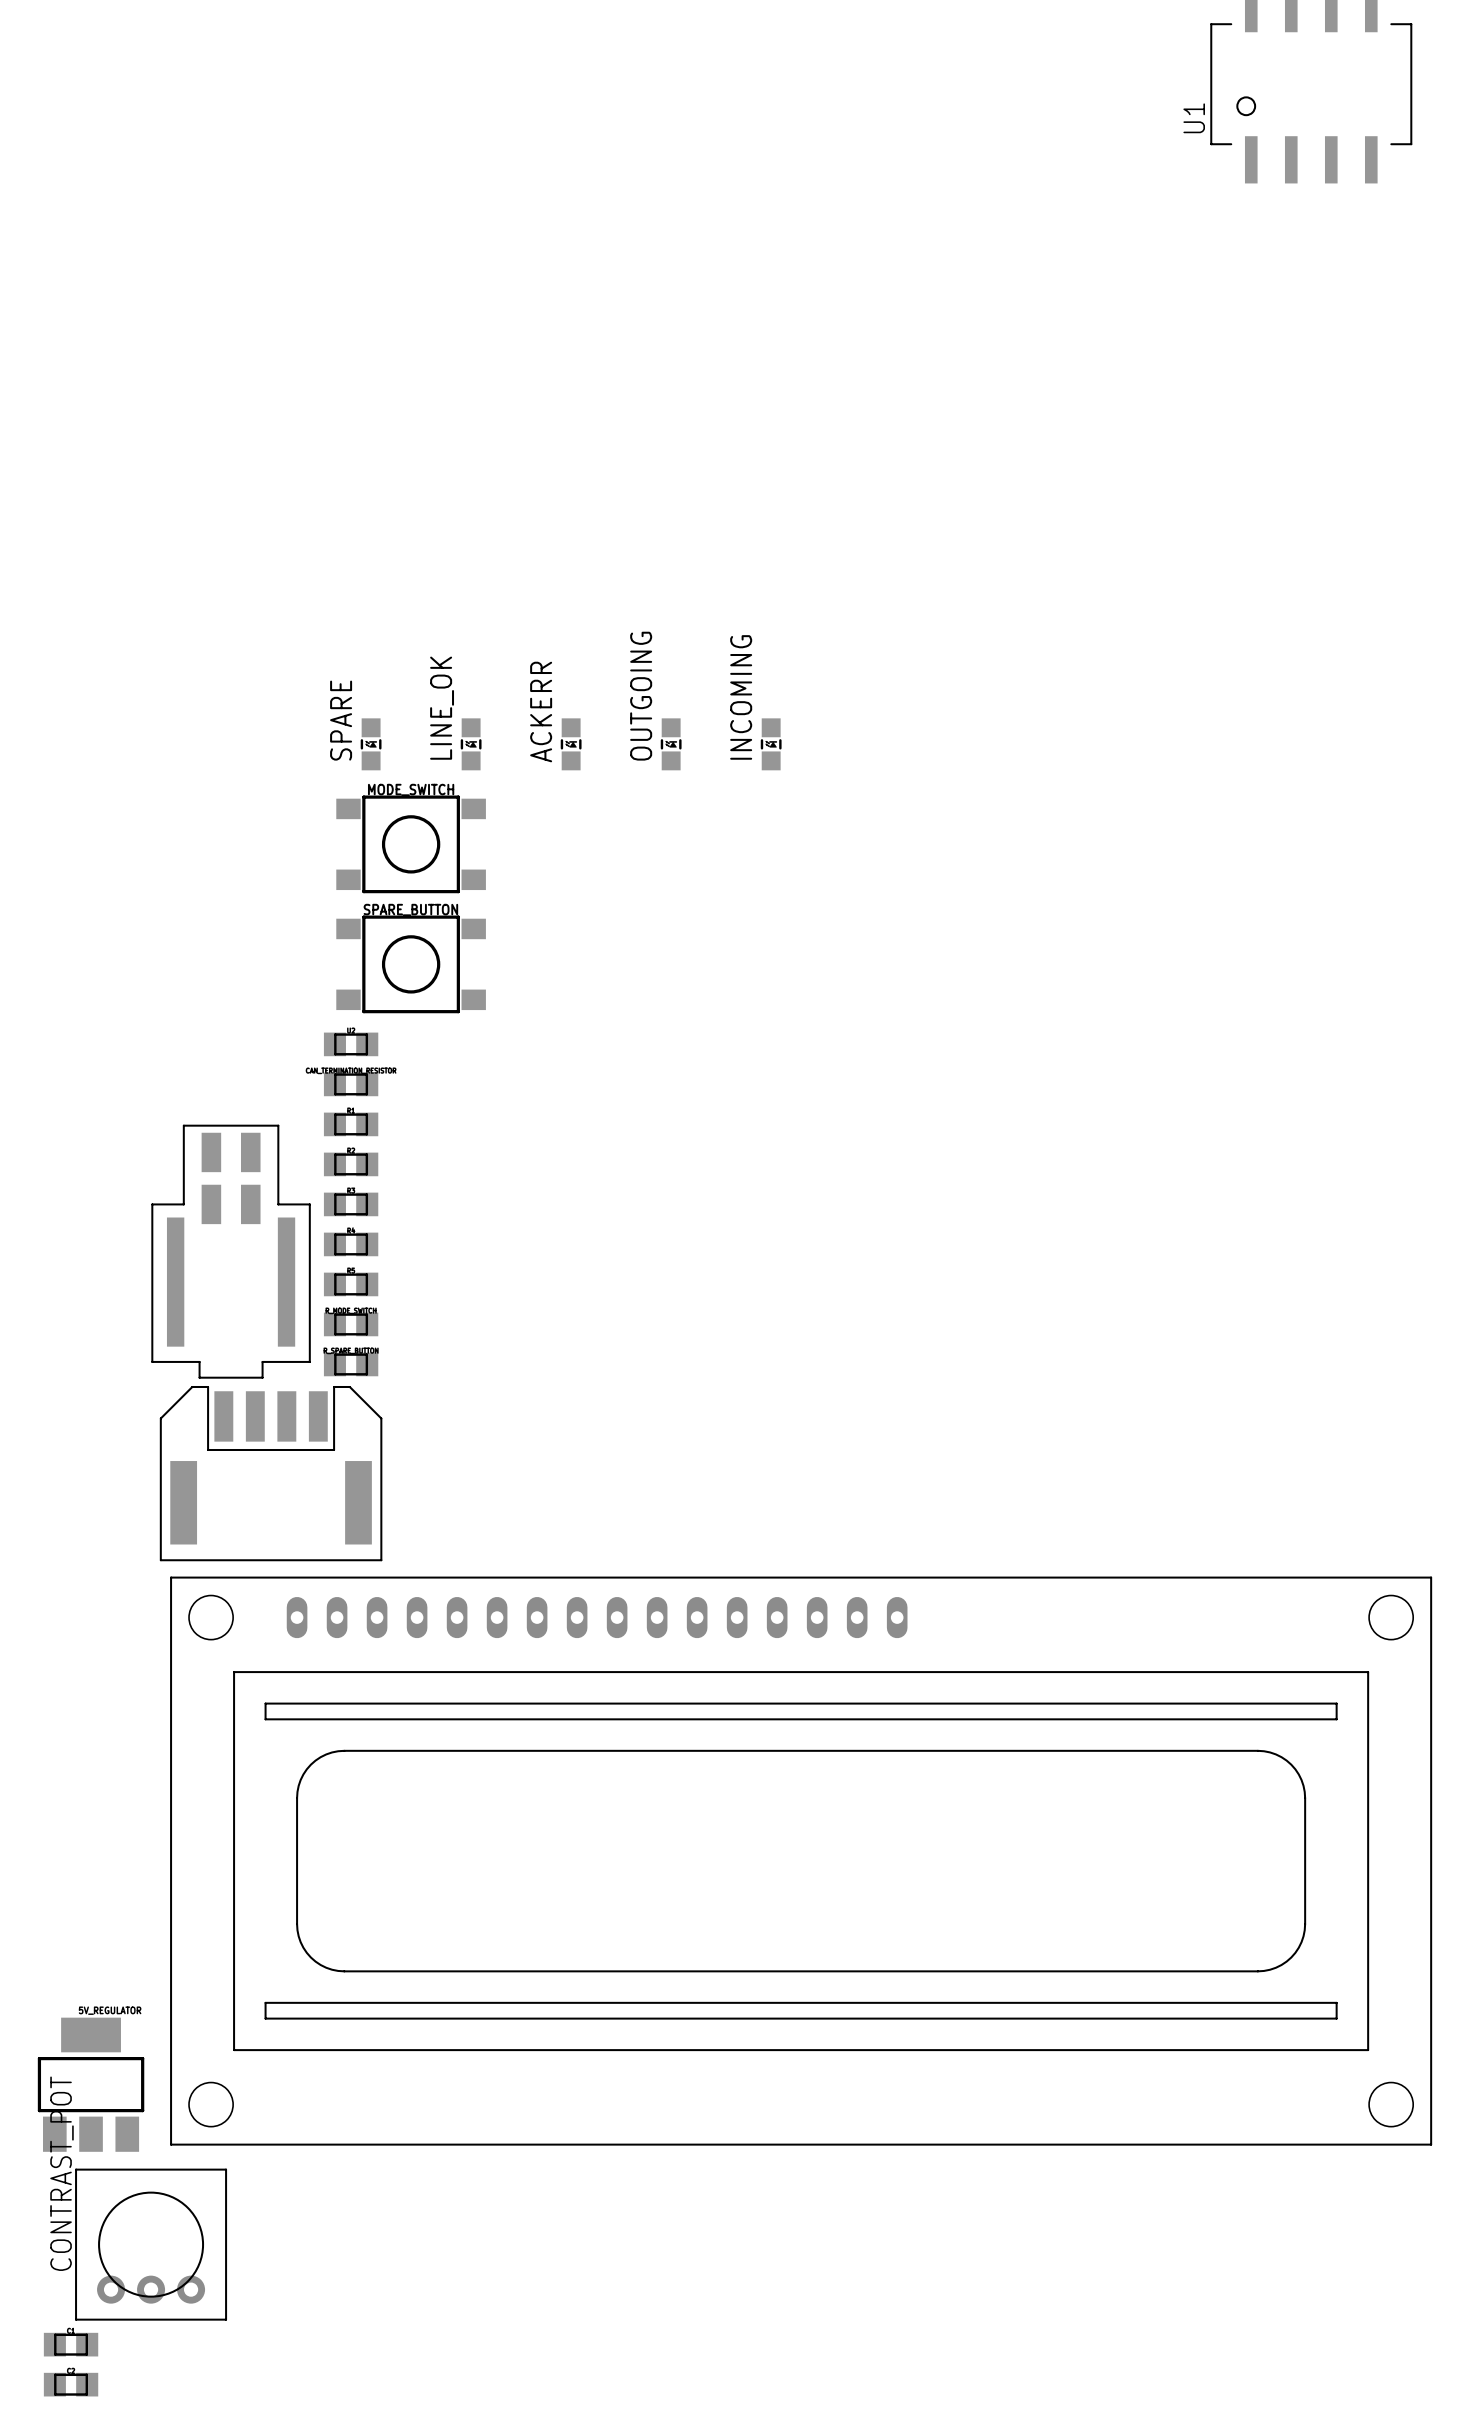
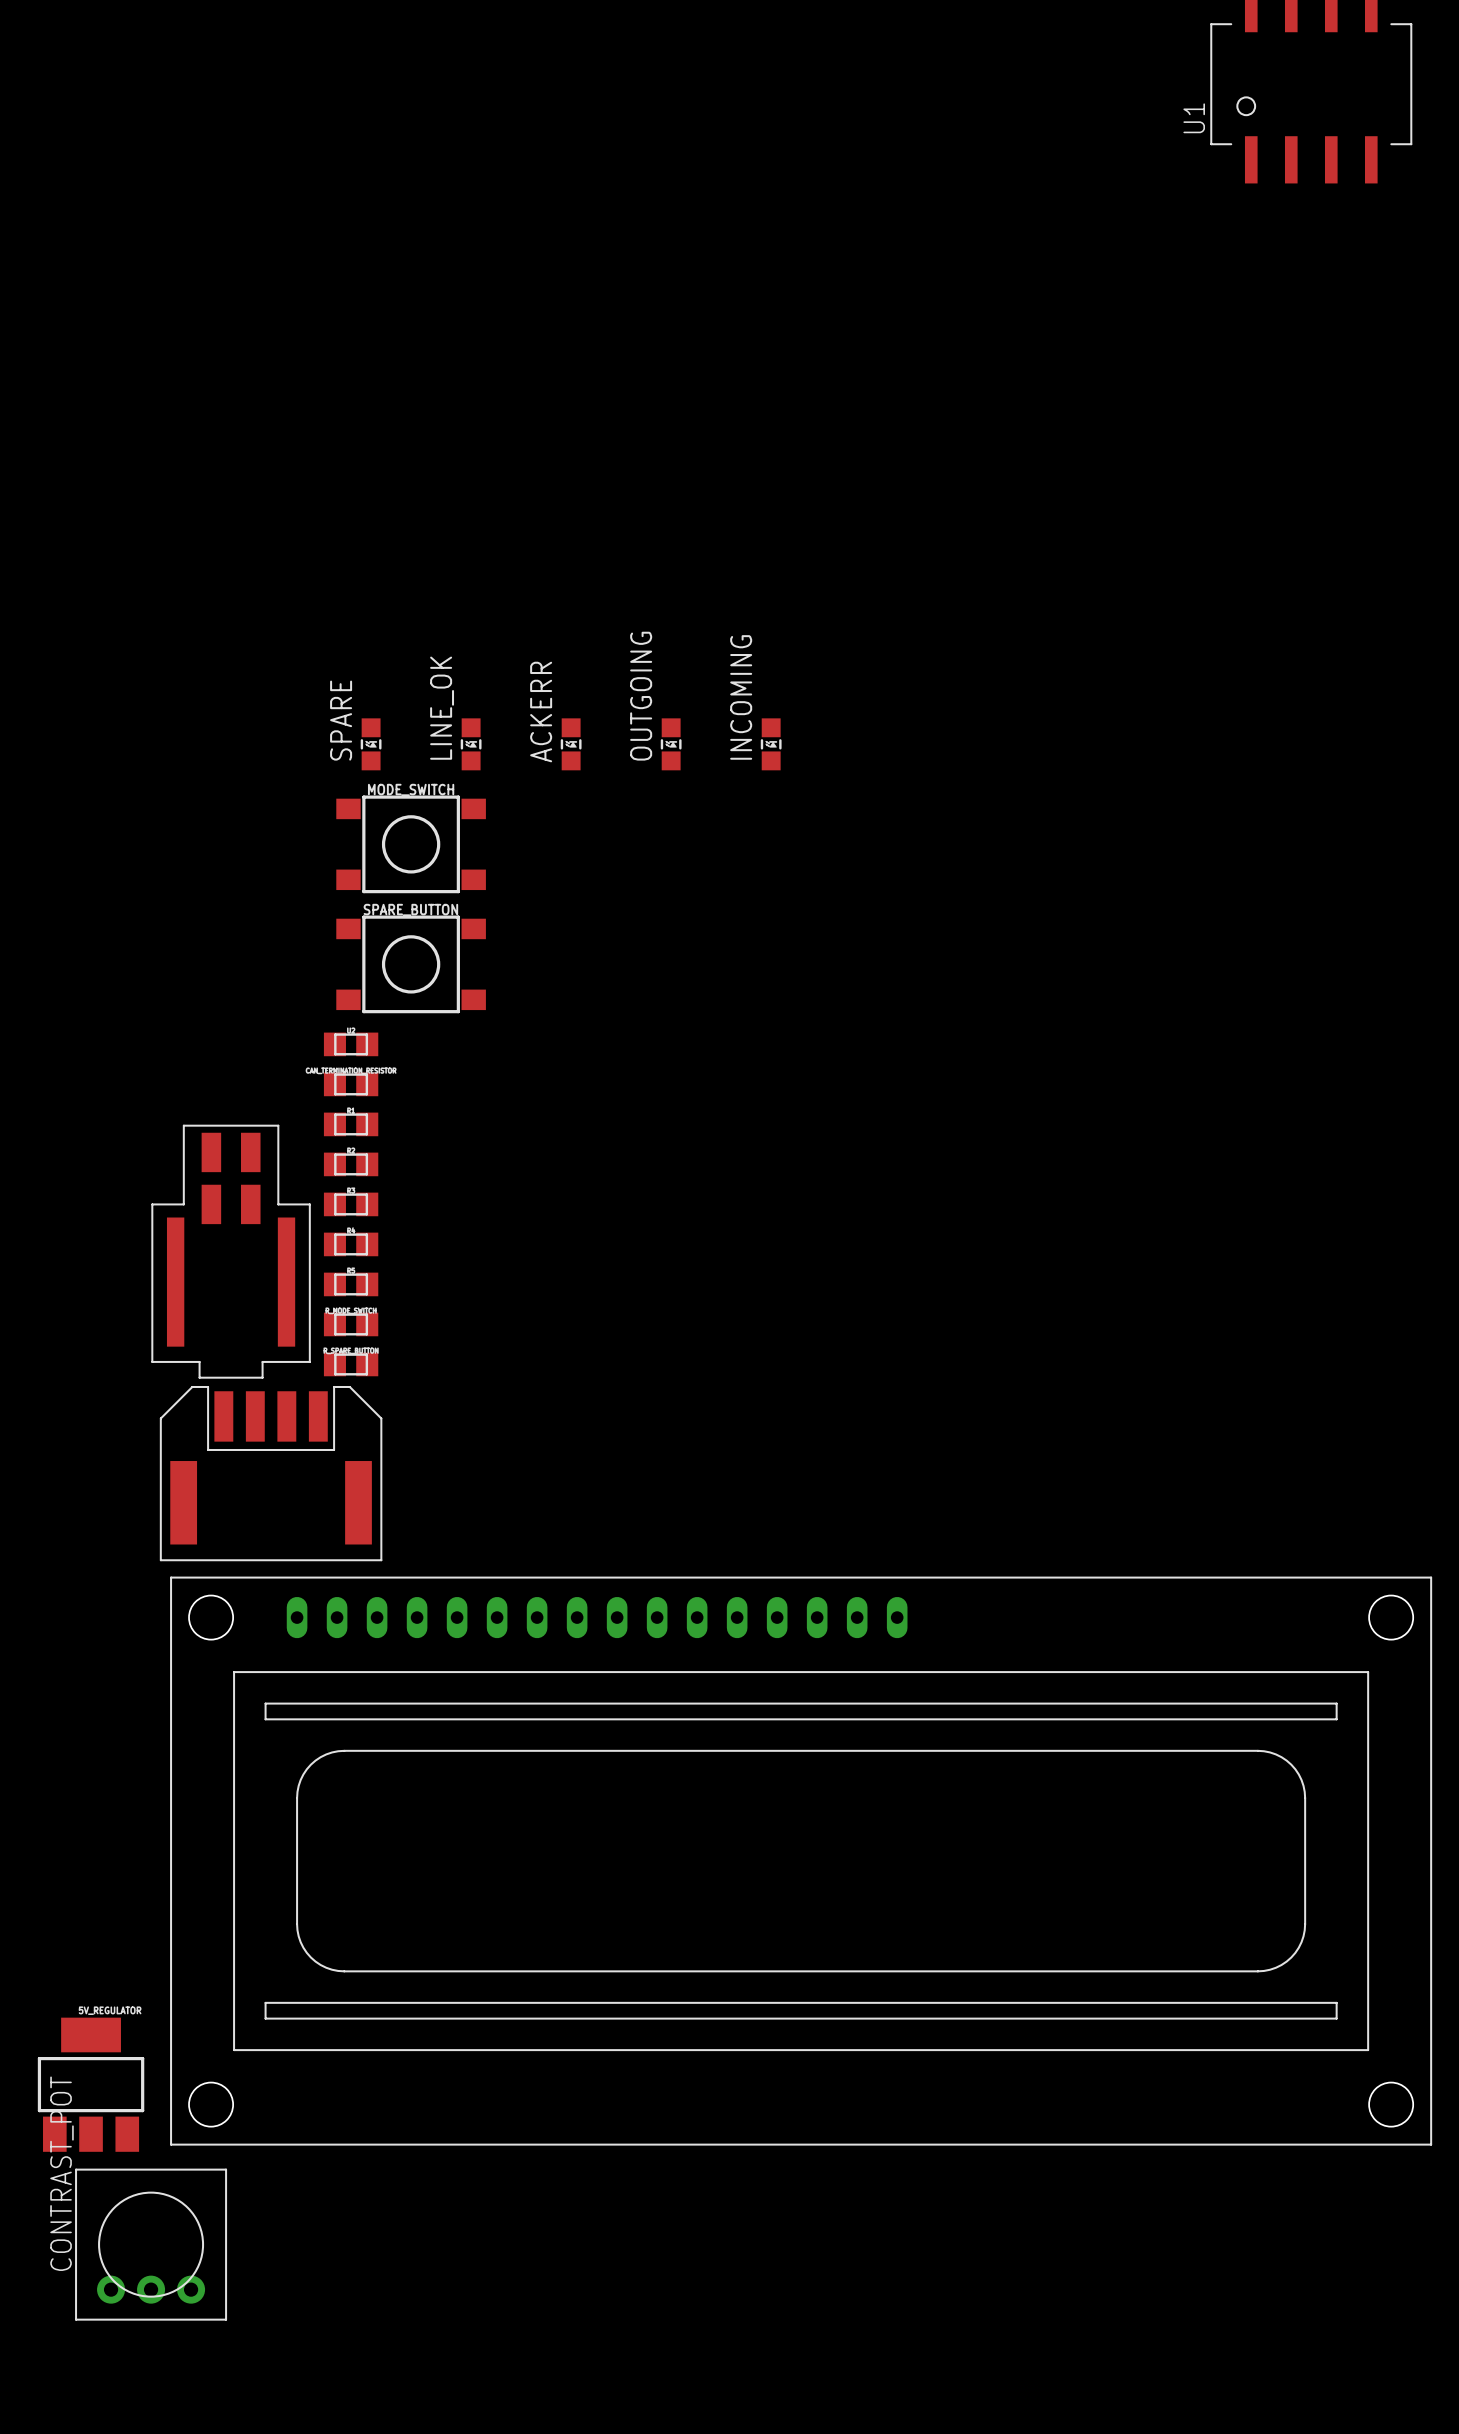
part: (71, 2344) -> none
part: (71, 2384) -> none

